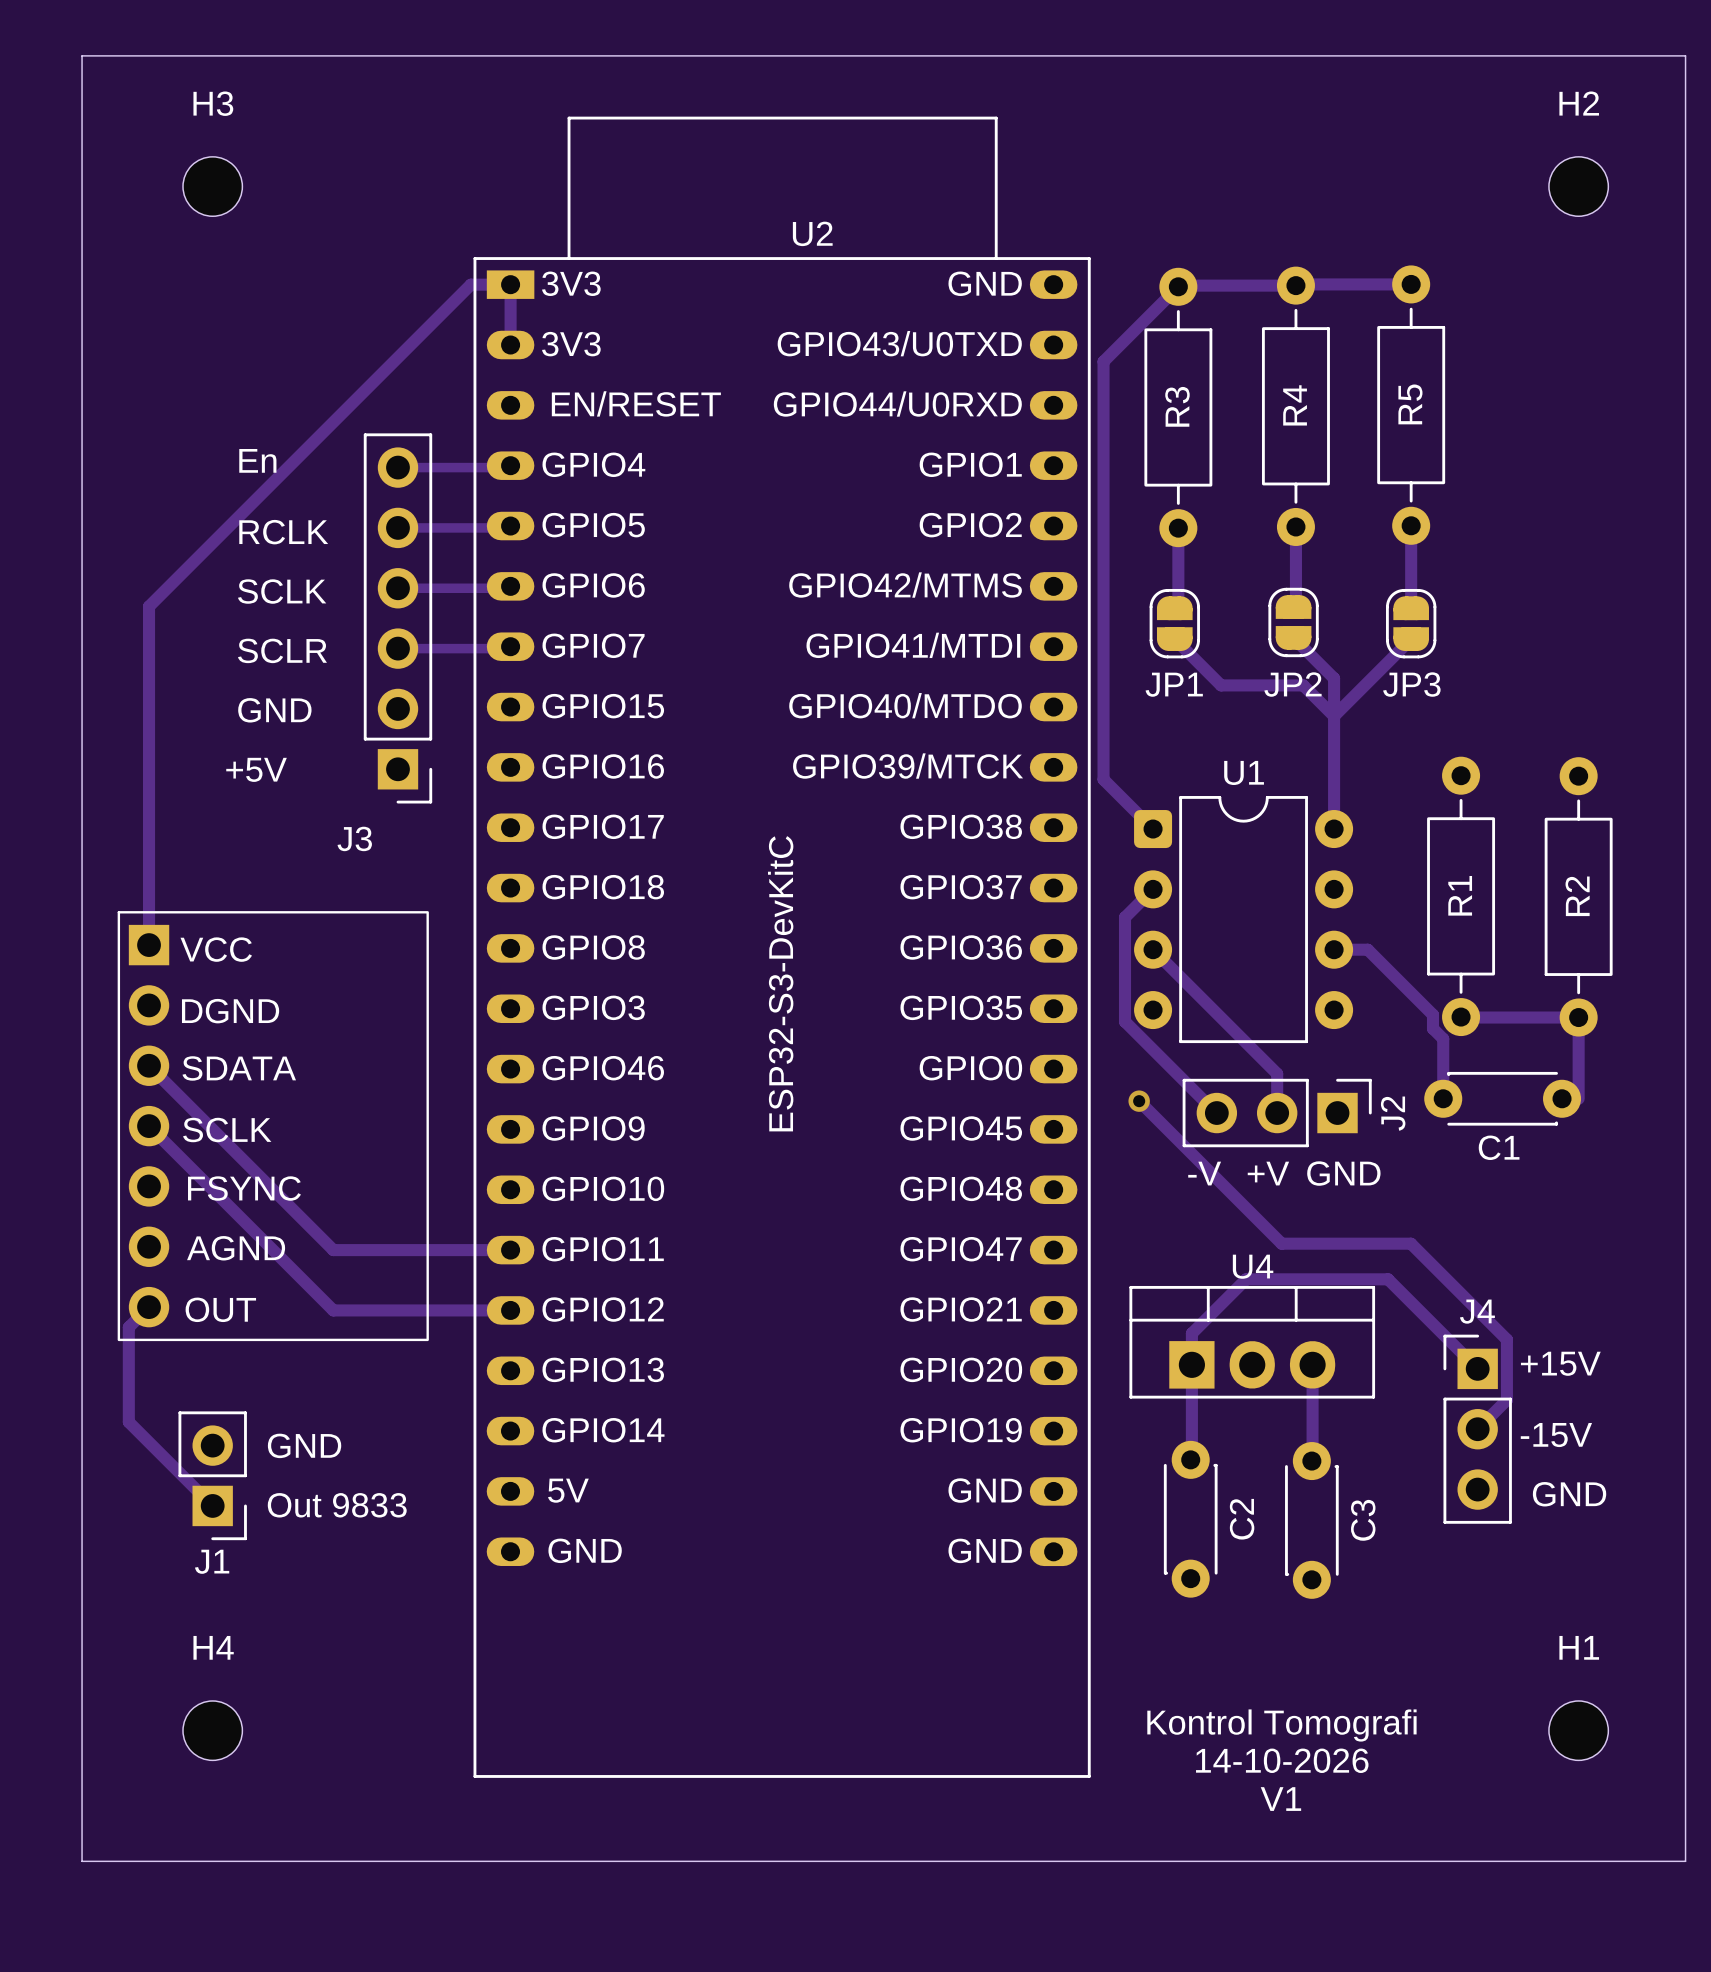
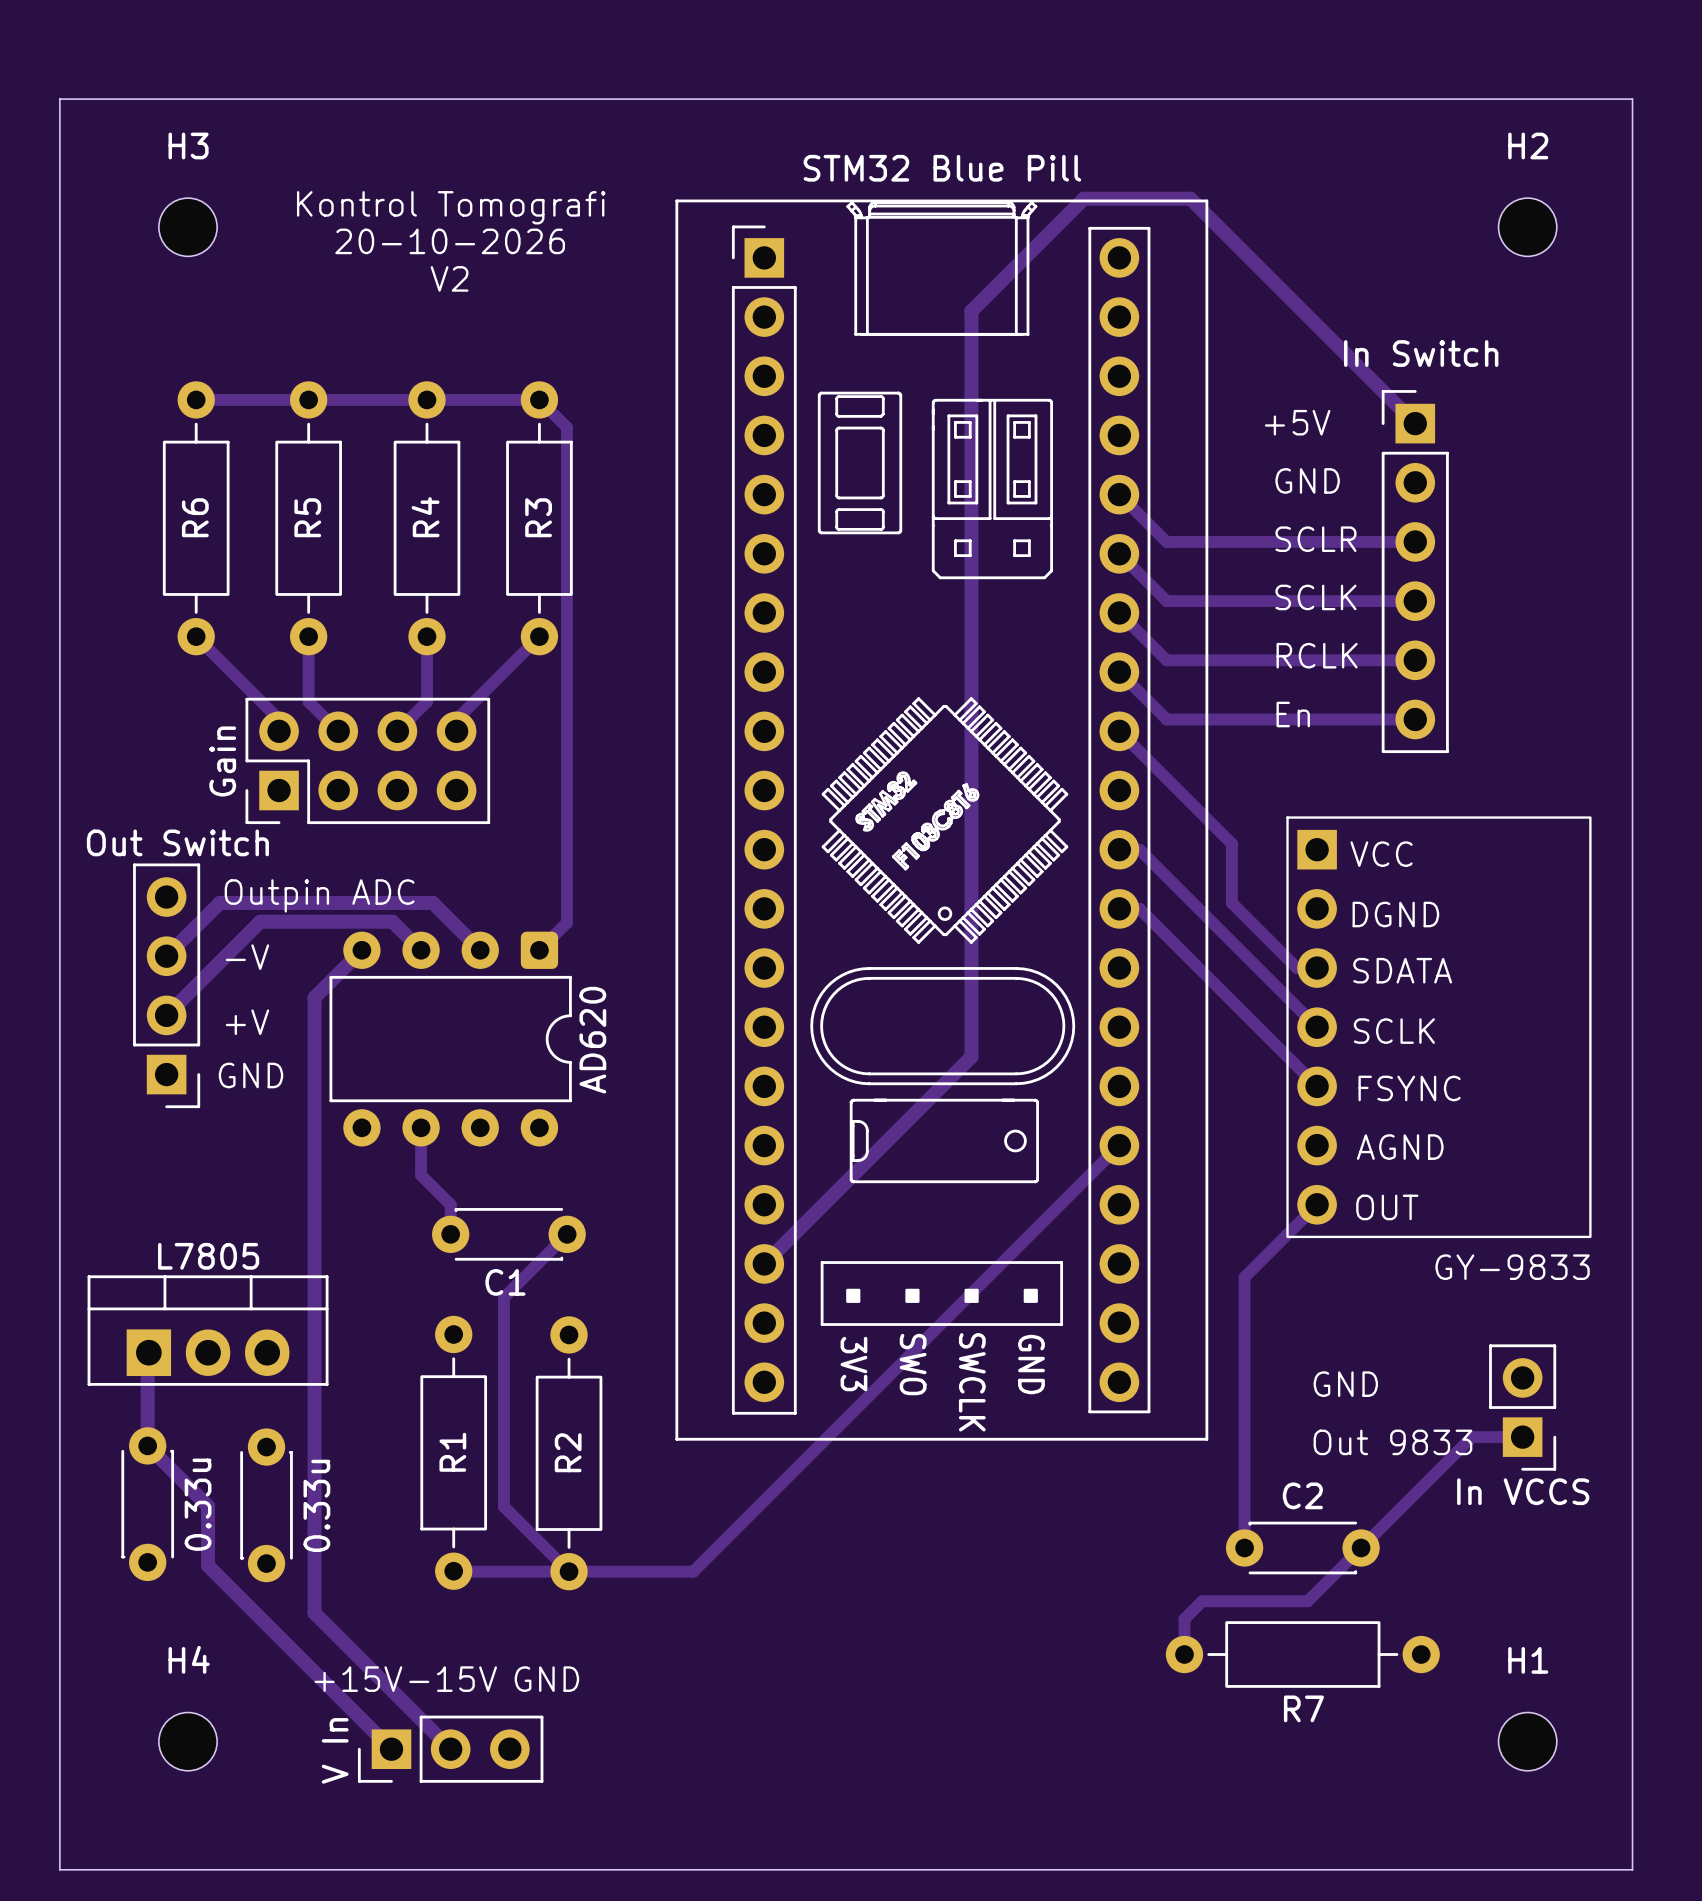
text: none -> Kontrol Tomografi (451, 207)
text: none -> 20-10-2026 (450, 241)
text: none -> V2 (449, 278)
track: (1411, 284) (1179, 285) (1103, 361) (1103, 779) (1153, 829) -> none
track: (510, 345) (510, 284) (470, 284) (149, 606) (149, 945) -> none
track: none -> (196, 399) (539, 399) (566, 427) (566, 922) (539, 950)
text: none -> +5V (1297, 422)
track: none -> (1415, 423) (1190, 198) (1083, 198) (971, 311) (971, 1056) (764, 1263)
R5 position: (1411, 405) -> (308, 518)
R4 position: (1295, 406) -> (427, 518)
R3 position: (1178, 407) -> (539, 518)
text: none -> GND (1307, 480)
track: none -> (1119, 494) (1166, 541) (1415, 541)
text: En (257, 460) -> none
track: (510, 465) (508, 467) (397, 467) -> none
R6: none -> (196, 518)
text: none -> SCLR (1315, 539)
track: none -> (1119, 553) (1166, 601) (1415, 601)
track: (1411, 525) (1411, 608) -> none
track: (510, 526) (508, 527) (397, 527) -> none
track: (1295, 526) (1295, 604) (1293, 607) -> none
track: (1178, 528) (1178, 604) (1174, 608) -> none
text: RCLK (283, 532) -> none
In Switch: none -> (1415, 571)
text: none -> SCLK (1315, 597)
track: none -> (1119, 612) (1166, 660) (1415, 660)
track: (510, 586) (508, 588) (397, 588) -> none
text: SCLK (282, 591) -> none
track: none -> (196, 636) (279, 719) (279, 731)
track: none -> (308, 636) (308, 701) (338, 731)
track: none -> (427, 636) (427, 701) (397, 731)
track: none -> (539, 636) (456, 719) (456, 731)
J3: (397, 618) -> none
JP2: (1293, 622) -> none
JP1: (1174, 623) -> none
text: none -> RCLK (1317, 655)
JP3: (1411, 623) -> none
track: (1293, 637) (1334, 678) (1334, 829) -> none
track: (1174, 639) (1221, 685) (1303, 685) (1334, 716) (1411, 639) -> none
track: none -> (1119, 672) (1166, 719) (1415, 719)
track: (510, 646) (508, 648) (397, 648) -> none
text: SCLR (282, 650) -> none
text: none -> En (1293, 714)
track: none -> (1119, 731) (1231, 843) (1231, 902) (1296, 968) (1317, 968)
text: GND (274, 710) -> none
Gain: none -> (367, 760)
text: +5V (256, 769) -> none
STM32 Blue Pill: none -> (941, 820)
track: none -> (1119, 849) (1139, 849) (1317, 1027)
text: none -> Outpin ADC (319, 895)
track: none -> (1119, 908) (1139, 908) (1317, 1086)
track: (1153, 889) (1125, 917) (1125, 1021) (1216, 1113) -> none
R1 position: (1461, 896) -> (453, 1452)
R2 position: (1578, 896) -> (569, 1453)
U1: (1243, 919) -> none
track: none -> (361, 950) (314, 997) (314, 1613) (450, 1749)
track: none -> (421, 950) (392, 921) (260, 921) (166, 1015)
track: none -> (480, 950) (432, 902) (219, 902) (166, 956)
text: none -> -V (247, 957)
U2: ESP32-S3-DevKitC (782, 947) -> none
track: (1153, 949) (1277, 1073) (1277, 1113) -> none
track: (1334, 949) (1367, 949) (1433, 1014) (1433, 1028) (1443, 1038) (1443, 1098) -> none
Out Switch: none -> (166, 985)
text: none -> +V (247, 1022)
part: none -> (1438, 1027)
AD620: none -> (450, 1039)
track: (1461, 1017) (1578, 1017) (1578, 1098) -> none
text: none -> GND (250, 1075)
track: (149, 1065) (333, 1250) (510, 1250) -> none
C1 position: (1502, 1098) -> (508, 1234)
track: (1139, 1101) (1281, 1243) (1410, 1243) (1506, 1339) (1506, 1399) (1477, 1429) -> none
via: (1139, 1101) -> none
track: none -> (421, 1127) (421, 1175) (450, 1204) (450, 1234)
J2: (1277, 1113) -> none
track: none -> (1119, 1145) (693, 1571) (453, 1571)
track: (149, 1126) (333, 1310) (510, 1310) -> none
part: (273, 1126) -> none
text: -V (1204, 1173) -> none
text: +V (1268, 1173) -> none
text: GND (1343, 1173) -> none
track: none -> (1317, 1204) (1244, 1277) (1244, 1547)
track: none -> (567, 1234) (503, 1297) (503, 1506) (569, 1571)
text: none -> GY-9833 (1512, 1267)
track: (149, 1307) (128, 1327) (128, 1422) (212, 1505) -> none
L7805: none -> (208, 1330)
track: none -> (148, 1352) (147, 1445) (208, 1506) (208, 1565) (391, 1749)
U4: (1252, 1342) -> none
text: +15V (1560, 1363) -> none
track: (1312, 1364) (1311, 1461) -> none
text: none -> GND (1345, 1384)
track: (1477, 1368) (1388, 1279) (1246, 1279) (1191, 1333) (1190, 1459) -> none
In VCCS: none -> (1522, 1407)
track: none -> (1522, 1437) (1471, 1437) (1307, 1601) (1202, 1601) (1184, 1619) (1184, 1654)
text: none -> Out 9833 (1392, 1442)
J4: (1477, 1429) -> none
text: -15V (1556, 1435) -> none
text: GND (304, 1445) -> none
J1: (212, 1475) -> none
0.33u: none -> (147, 1504)
0.33u: none -> (266, 1505)
text: GND (1569, 1494) -> none
text: Out 9833 (337, 1505) -> none
C2 rotation: 0° (1190, 1519) -> 90° clockwise (1302, 1547)
C2 position: (1190, 1519) -> (1302, 1547)
C2 name position: C2 (1242, 1519) -> C2 (1302, 1495)
C3: (1311, 1520) -> none
R7: none -> (1302, 1654)
text: none -> GND (546, 1679)
text: none -> +15V (358, 1679)
text: none -> -15V (453, 1679)
text: Kontrol Tomografi (1281, 1725) -> none
V In: none -> (450, 1749)
text: 14-10-2026 (1282, 1760) -> none
text: V1 (1280, 1799) -> none

